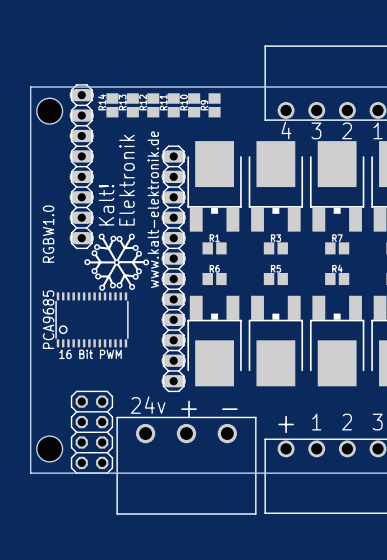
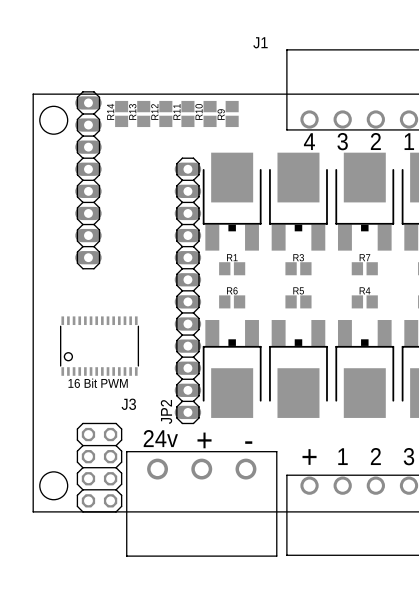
J1 name: none -> J1 (260, 42)
text: www.kalt-elektronik.de (153, 209) -> none
drawing: [84, 233, 150, 291] -> none
text: RGBW1.0 (48, 234) -> none
text: PCA9685 (48, 319) -> none
J3 name: none -> J3 (128, 404)
JP2 name: none -> JP2 (166, 411)

